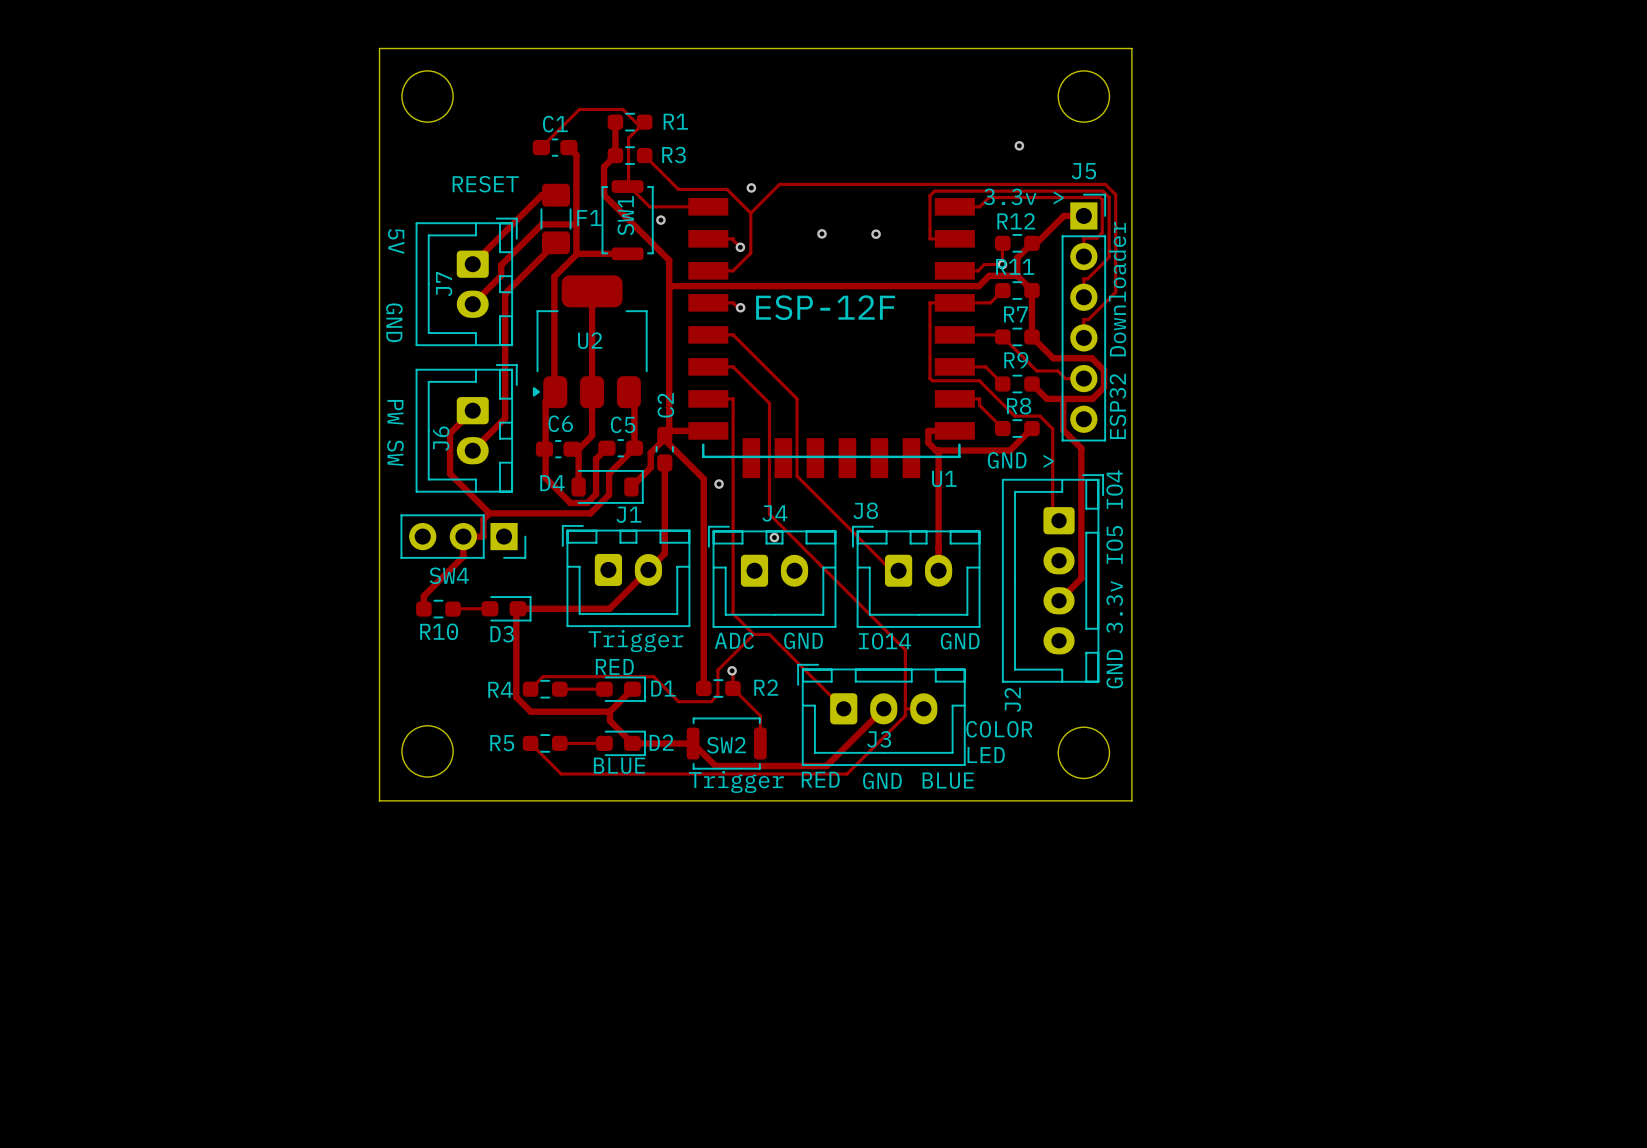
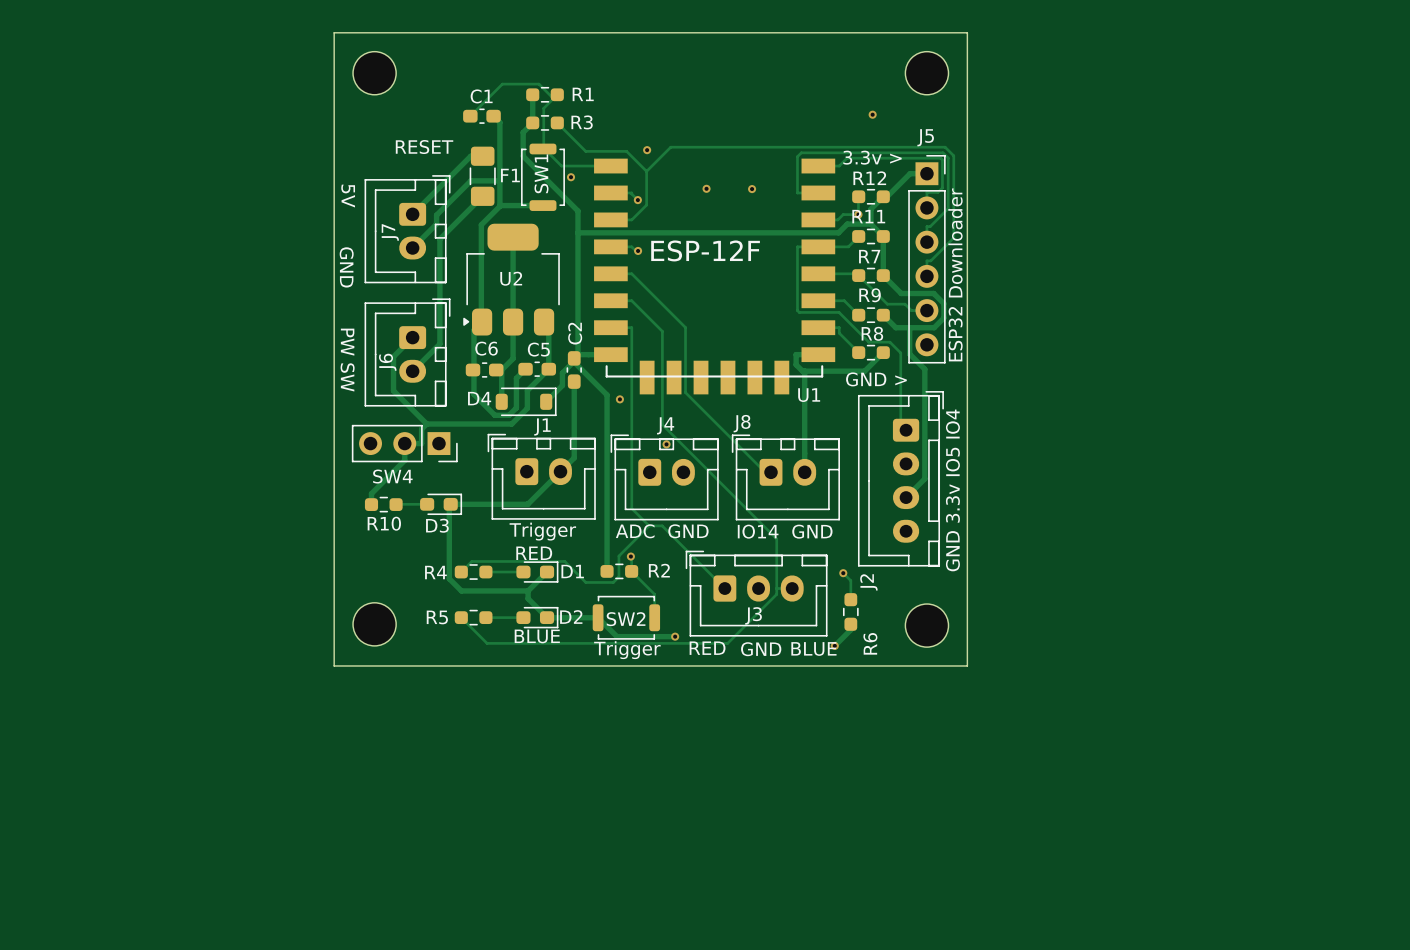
track: none -> (843, 573) (850, 580) (850, 599)
via: none -> (843, 573)
track: (883, 708) (826, 766) (784, 766) -> none
text: COLOR (999, 729) -> none
R6: none -> (850, 611)
track: none -> (850, 624) (850, 629) (834, 645)
text: LED (986, 755) -> none
via: none -> (675, 636)
via: none -> (834, 645)

